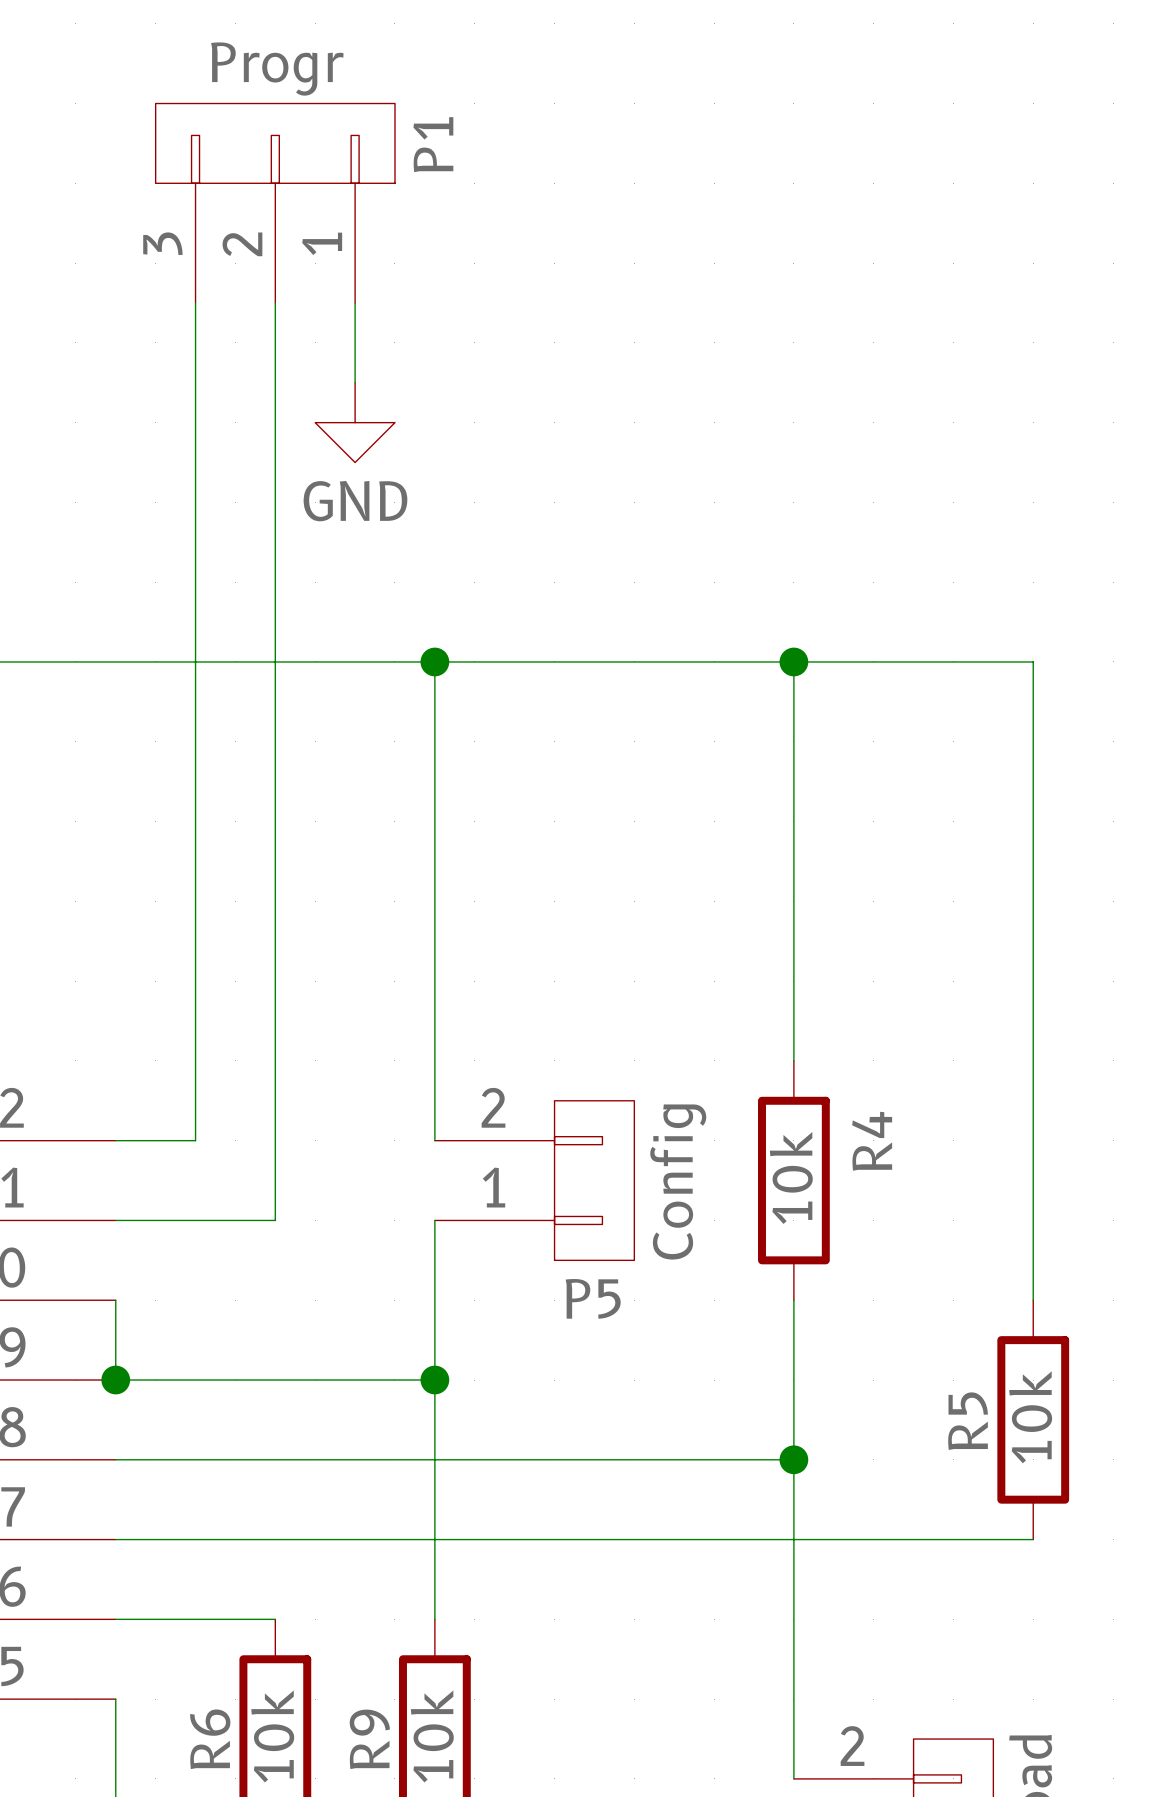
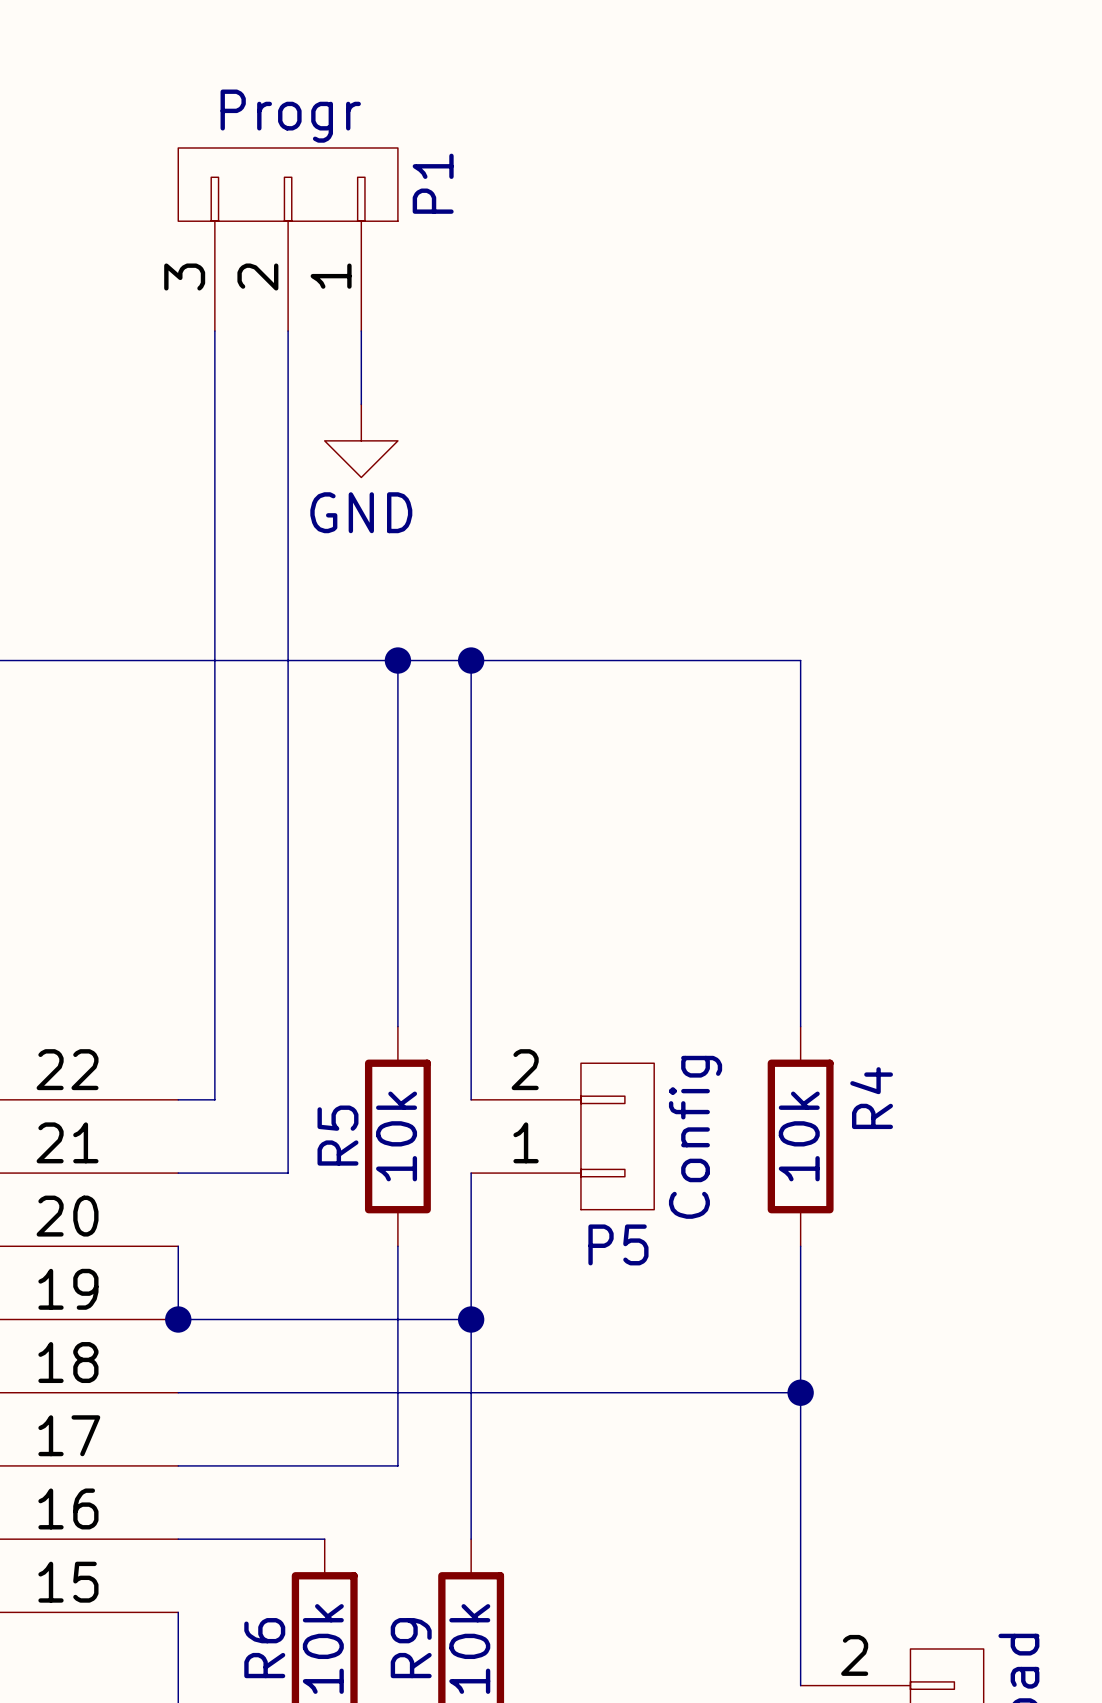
P1 position: (275, 203) -> (288, 239)
wire: (195, 302) (195, 1140) (155, 1140) -> (214, 331) (214, 1099)
wire: (275, 302) (275, 1220) (235, 1220) -> (288, 331) (288, 1173)
wire: (355, 302) (355, 382) -> (361, 331) (361, 404)
power symbol position: GND (355, 422) -> GND (361, 440)
wire: none -> (397, 660) (397, 1026)
junction: none -> (397, 660)
wire: (793, 661) (1033, 661) (1033, 1300) -> none
junction: (793, 661) -> none
R5 position: (1033, 1419) -> (397, 1136)
wire: (355, 1539) (1033, 1539) -> (397, 1465) (397, 1246)

